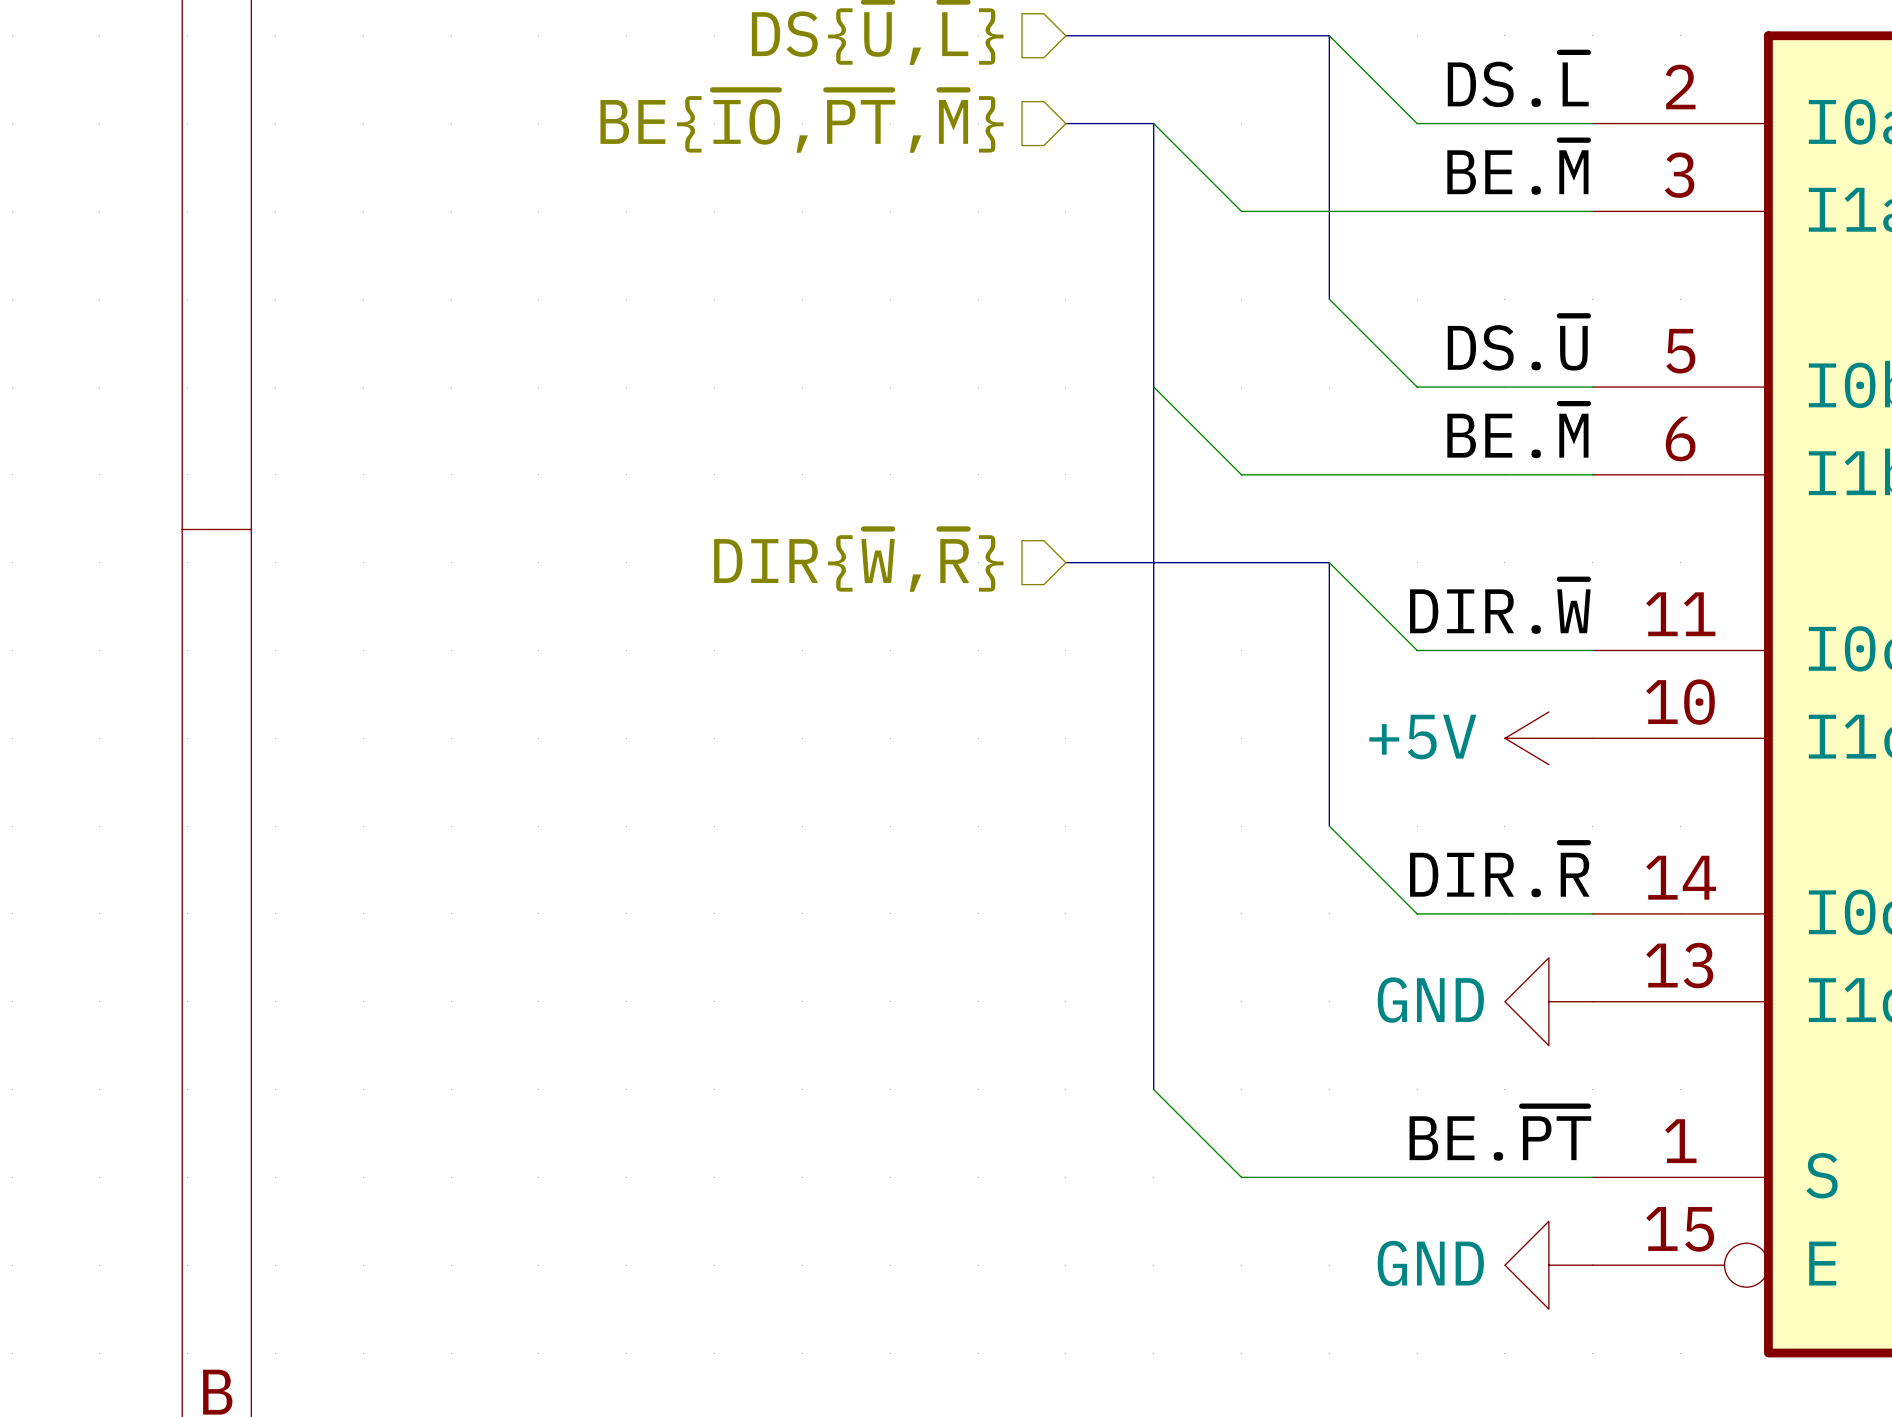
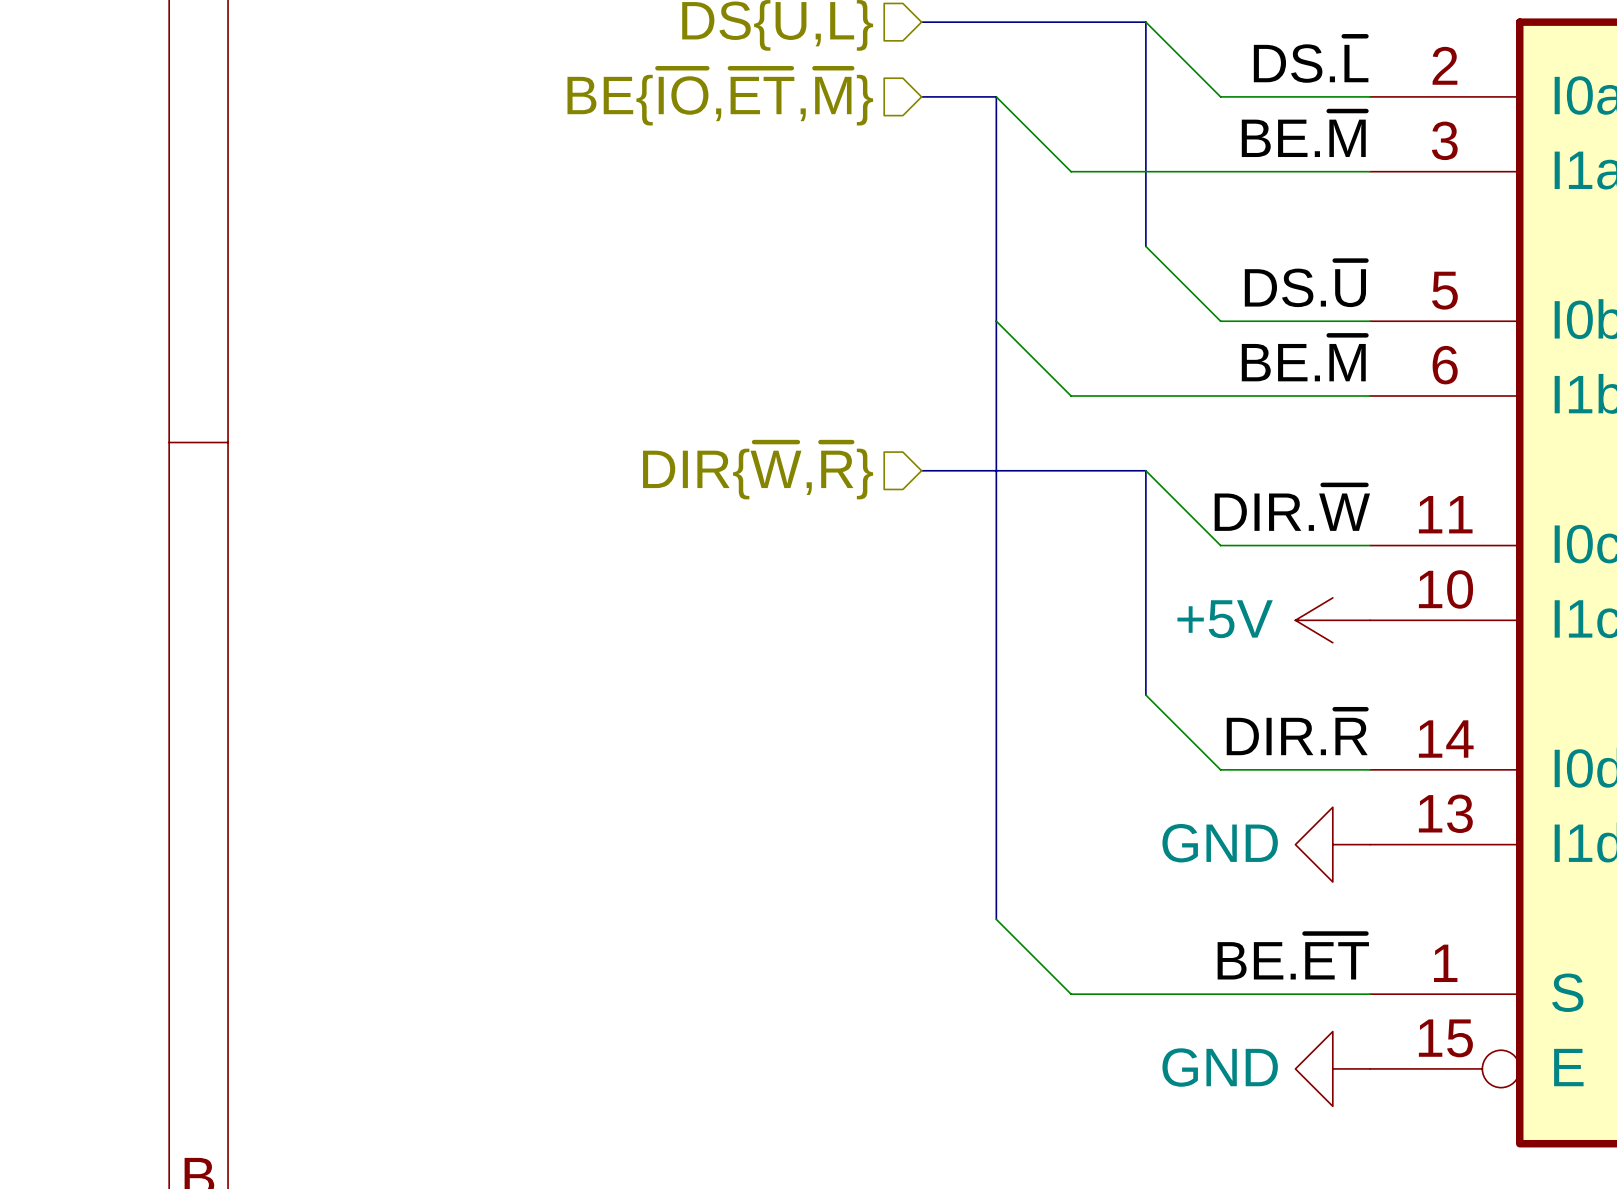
hierarchical label: BE{~{IO},~{PT},~{M}} (801, 121) -> BE{~{IO},~{ET},~{M}} (720, 96)
label: BE.~{PT} (1500, 1133) -> BE.~{ET} (1293, 956)

